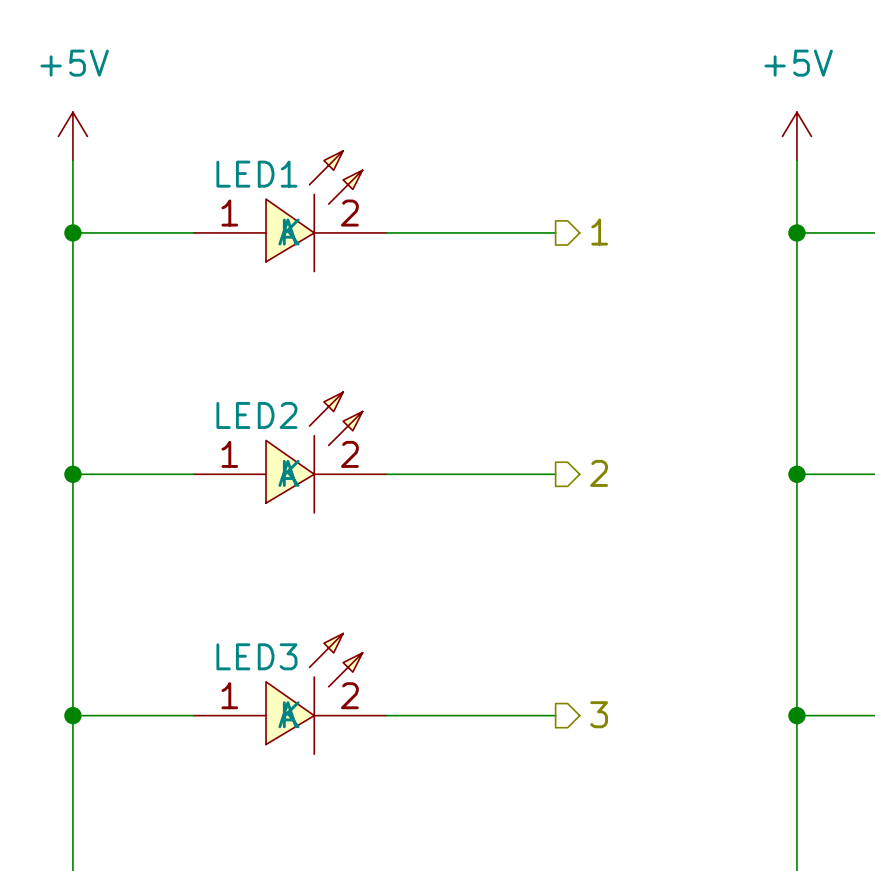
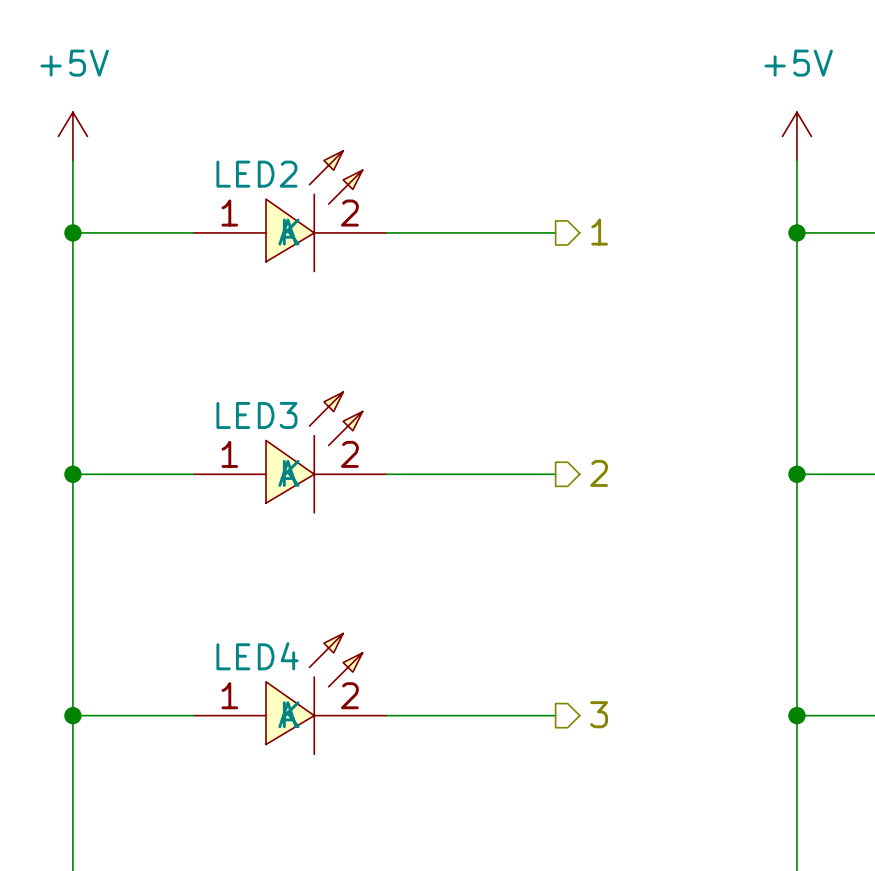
LED1 name: LED1 (256, 174) -> LED2 (256, 174)
LED2 name: LED2 (256, 415) -> LED3 (256, 415)
LED3 name: LED3 (256, 656) -> LED4 (257, 656)

